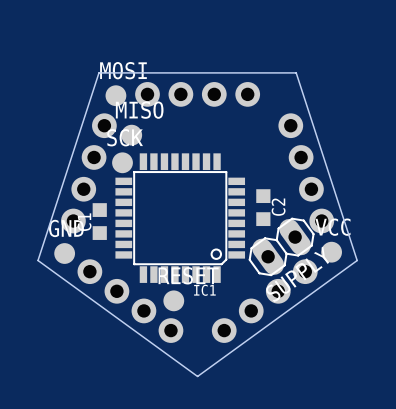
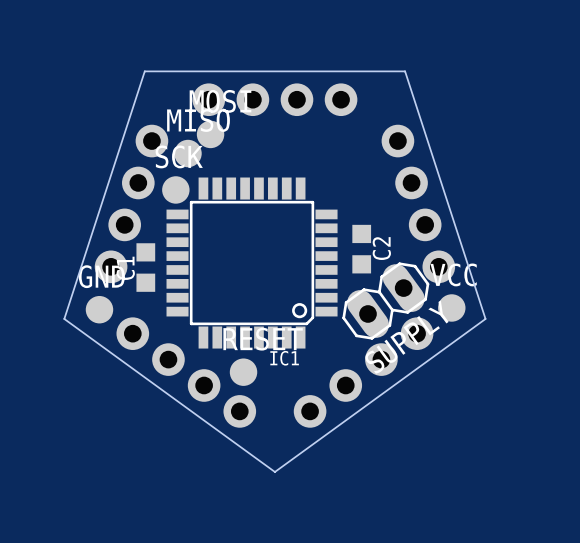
MOSI position: (115, 95) -> (210, 134)

